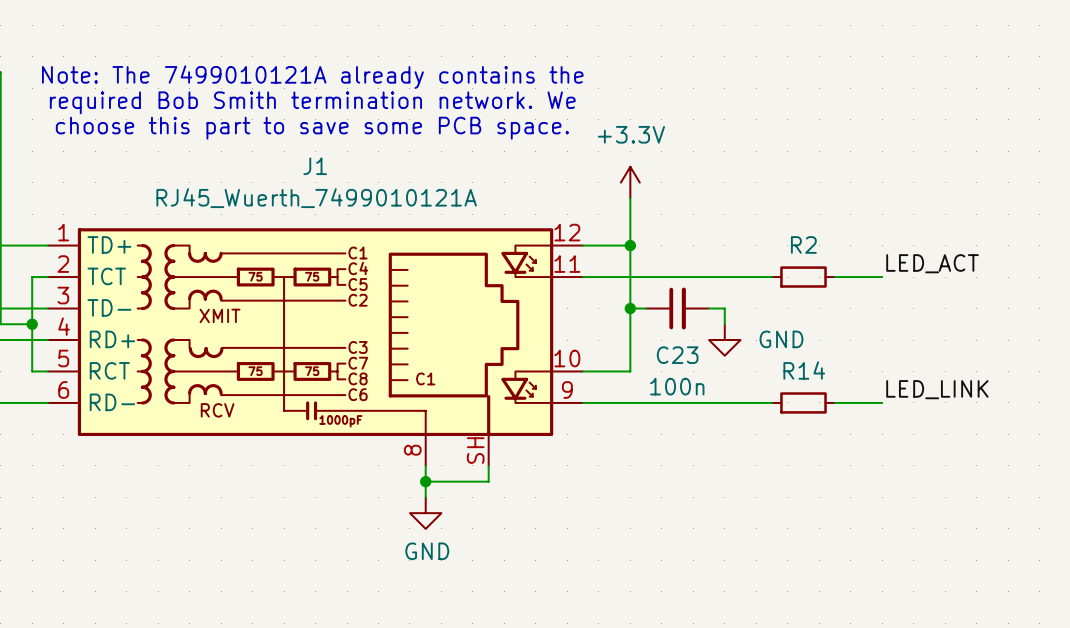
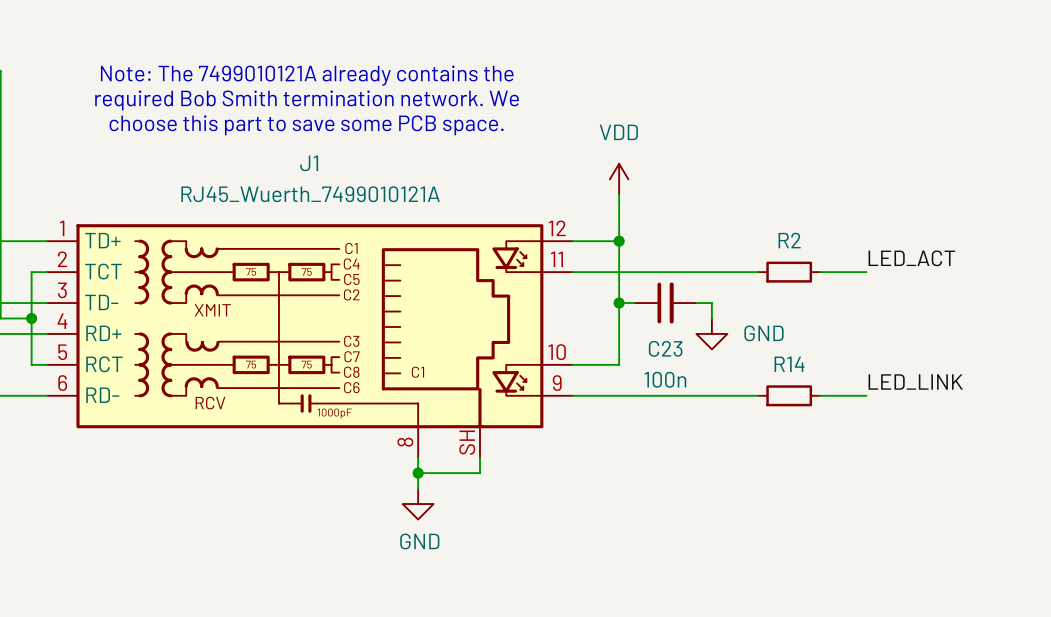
power symbol: +3.3V (630, 182) -> VDD (619, 179)

